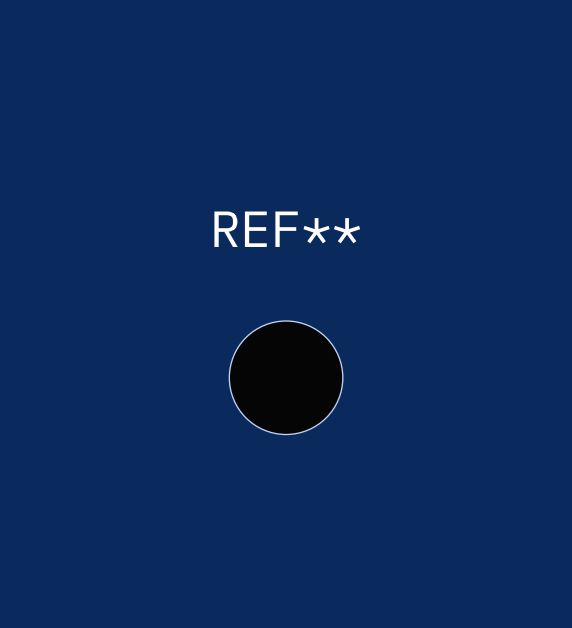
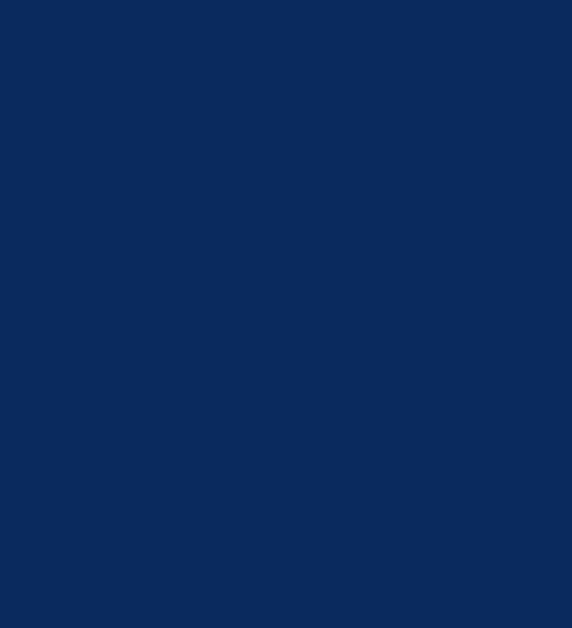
REF**: (286, 377) -> none

